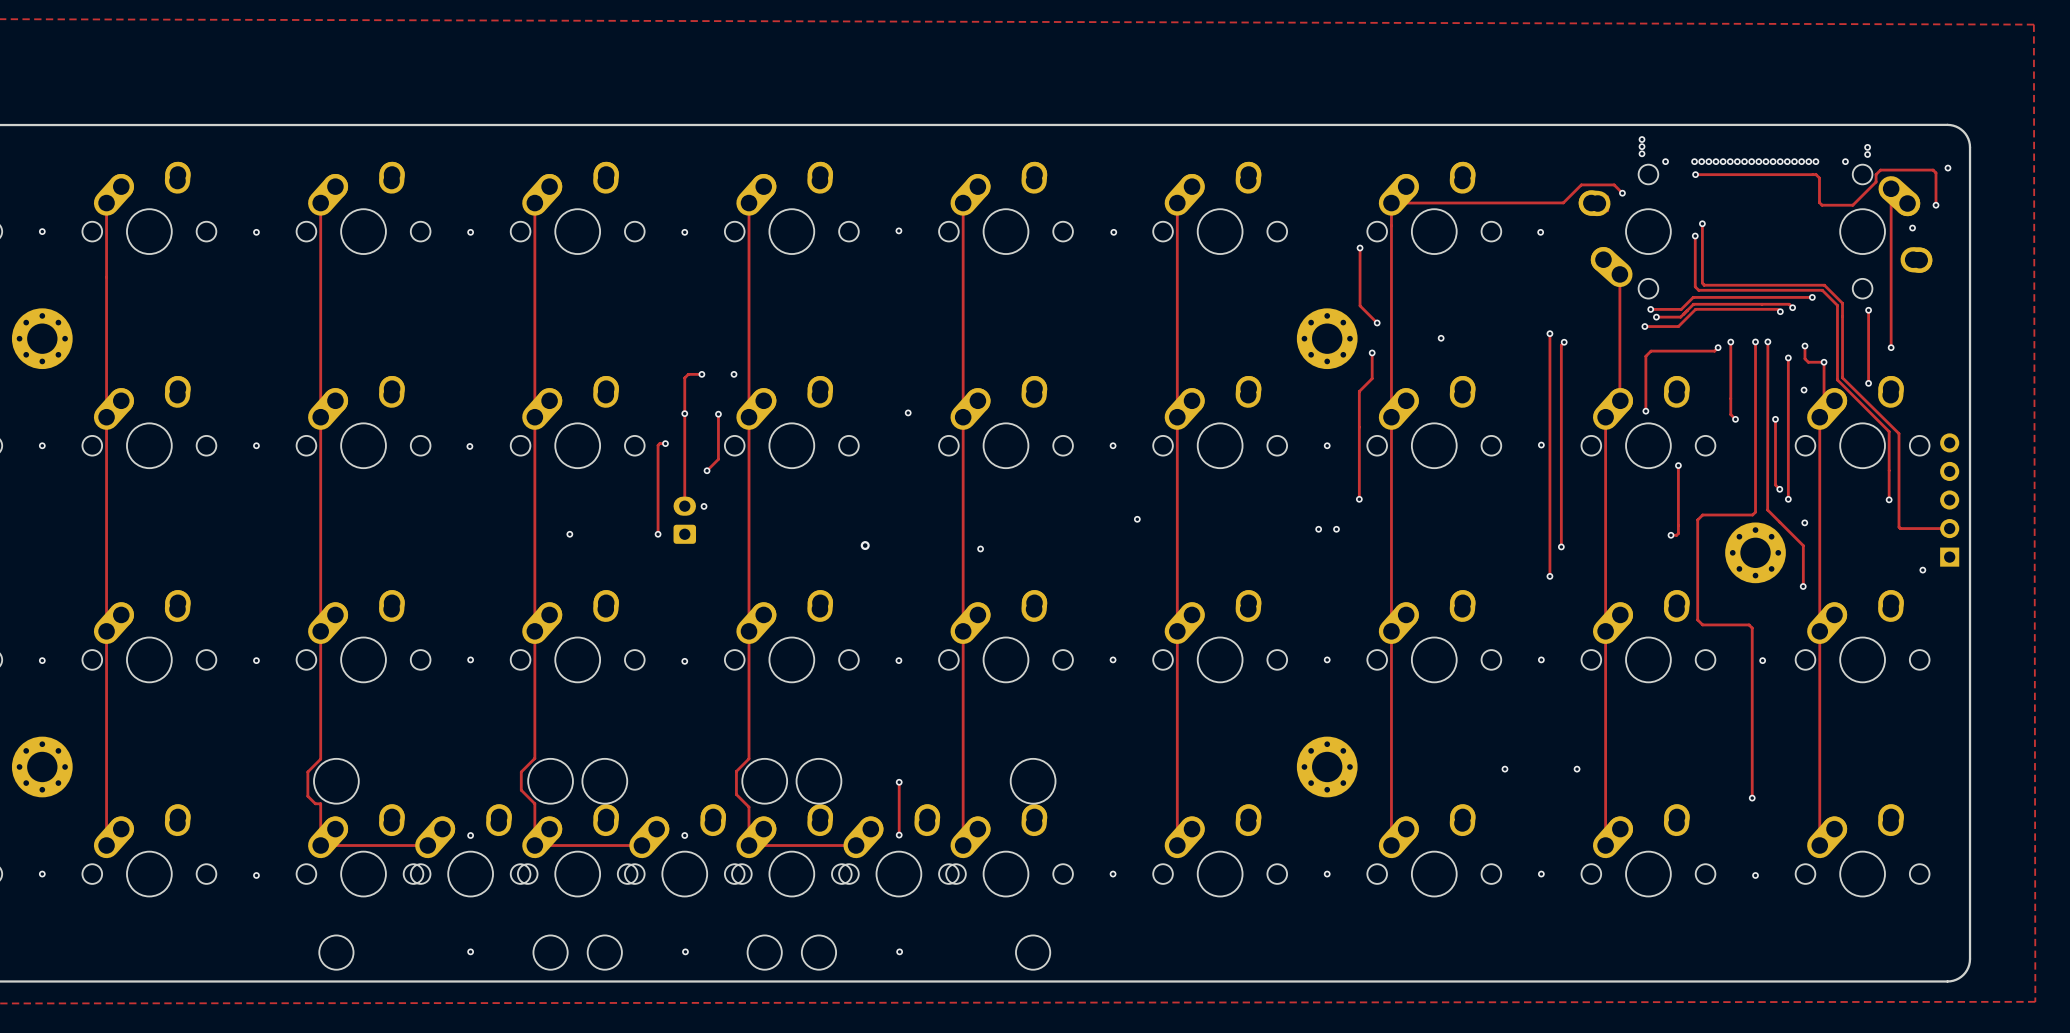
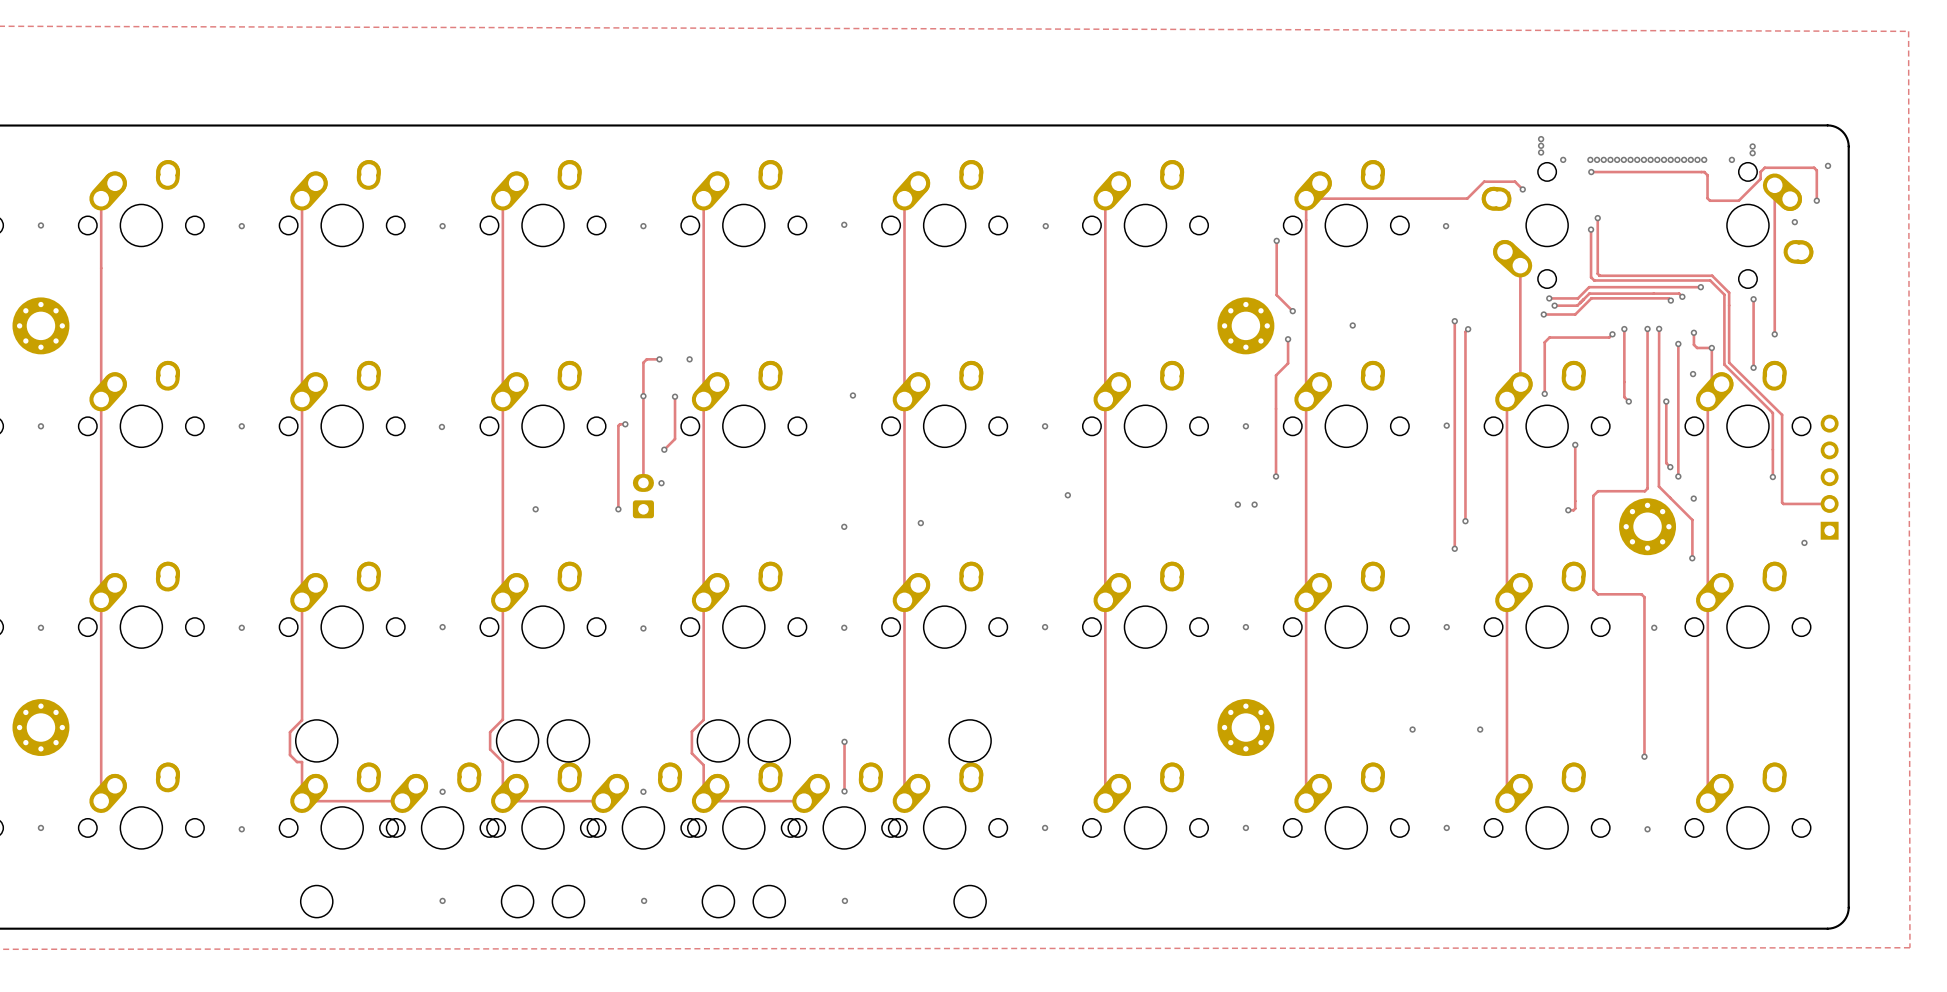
via: (865, 545) -> none
via: none -> (844, 526)

